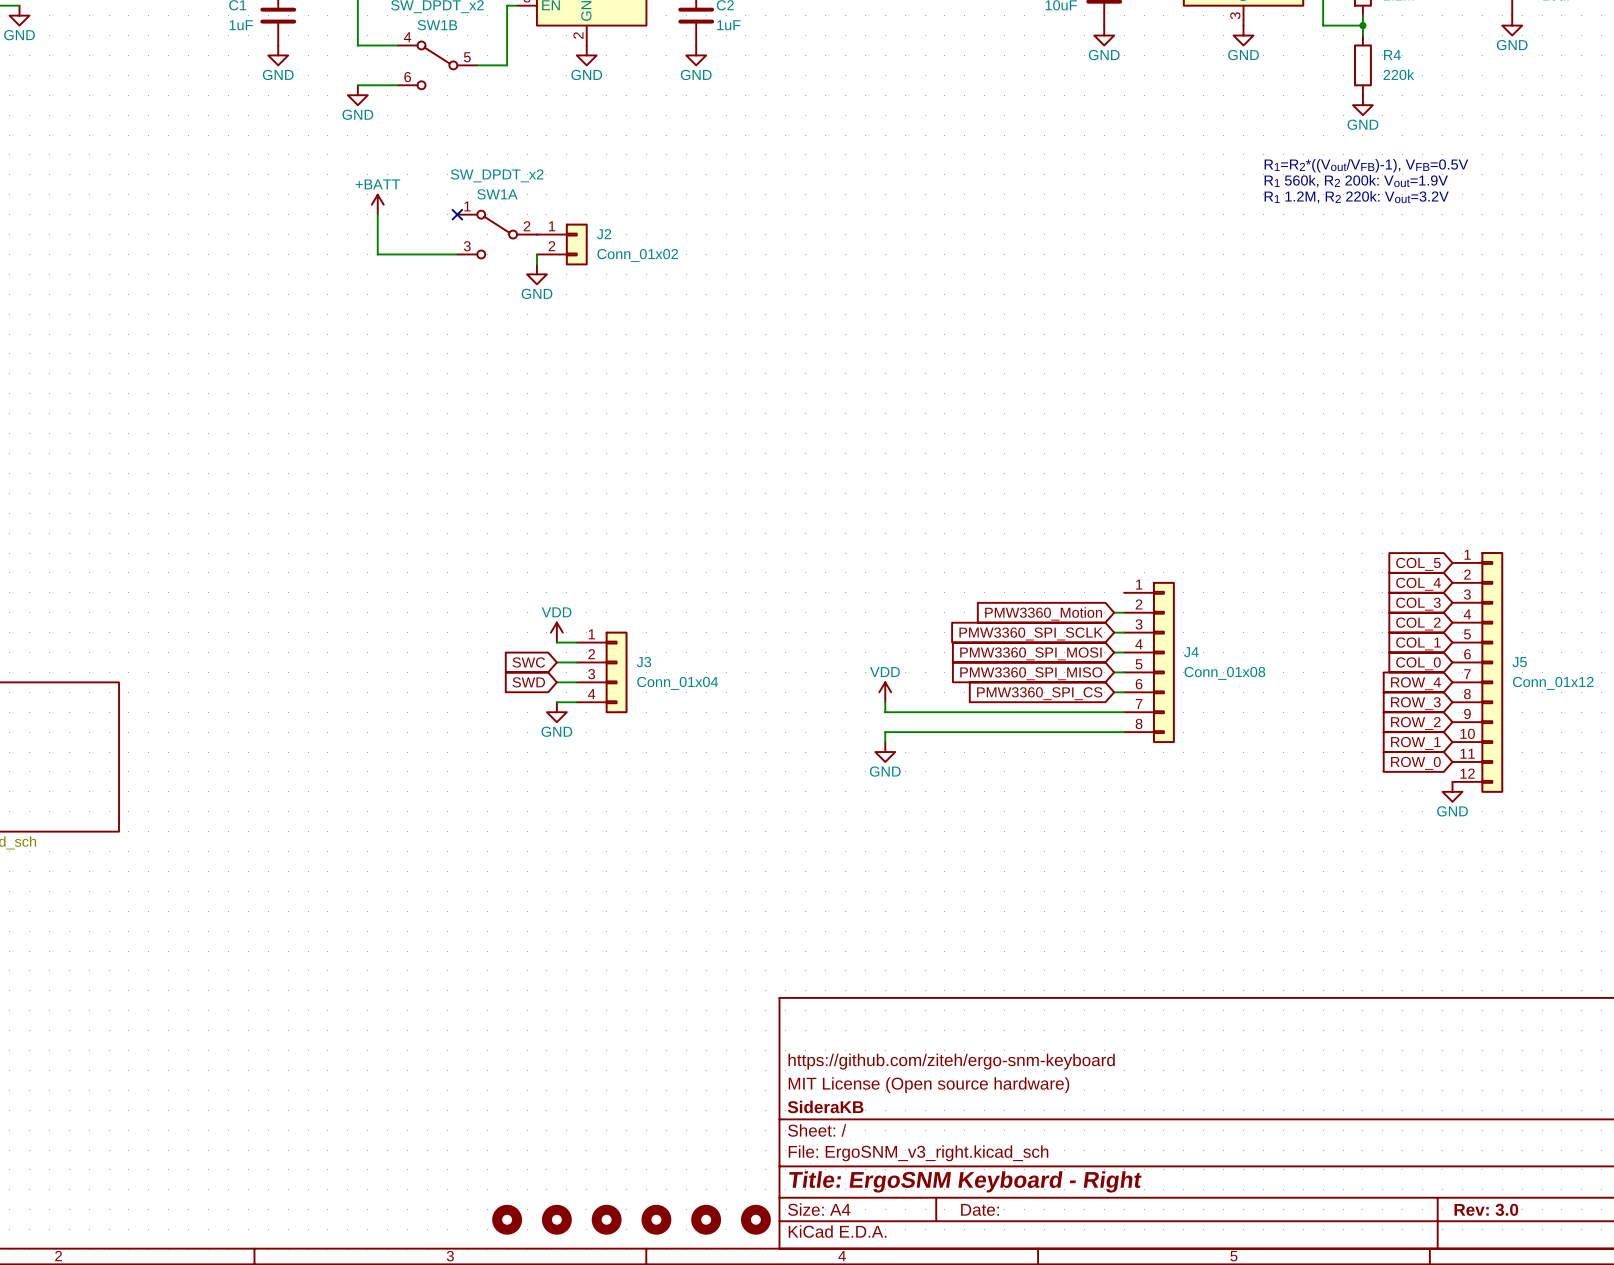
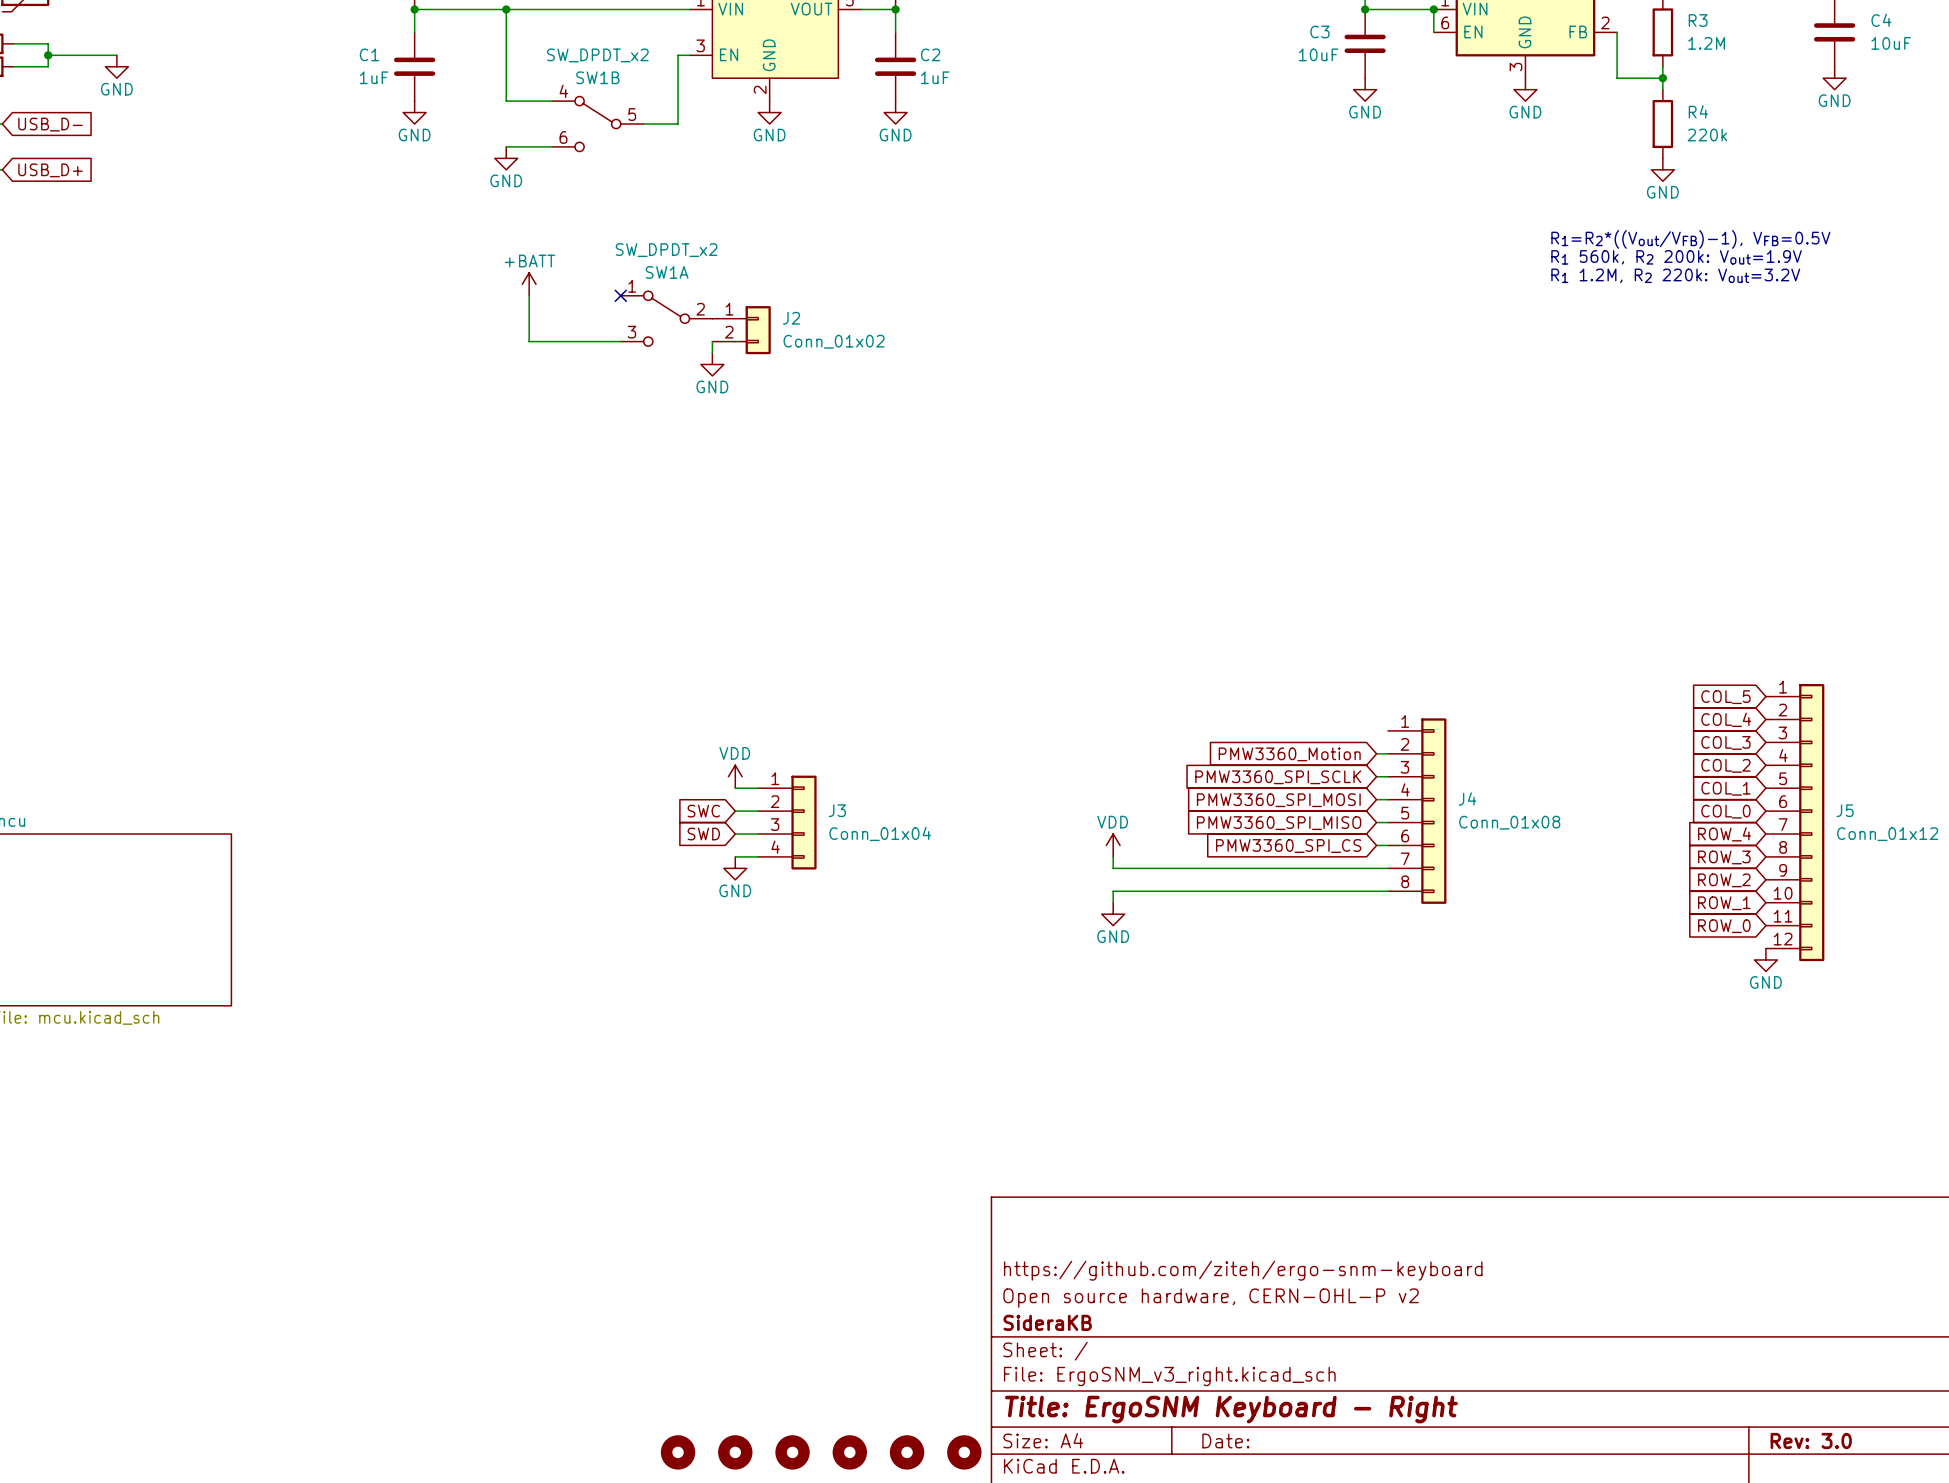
title block: MIT License (Open source hardware) (928, 1085) -> Open source hardware, CERN-OHL-P v2 (1211, 1298)

